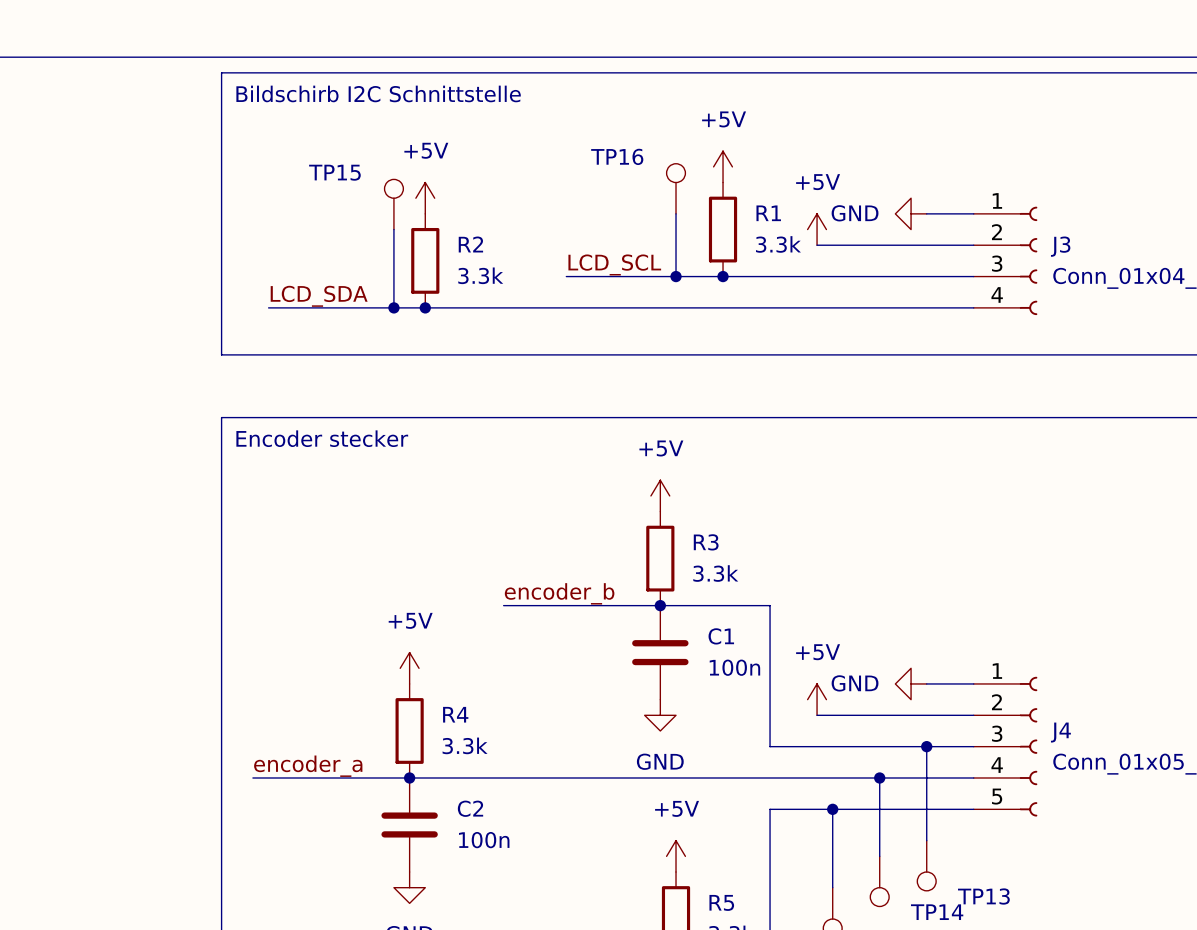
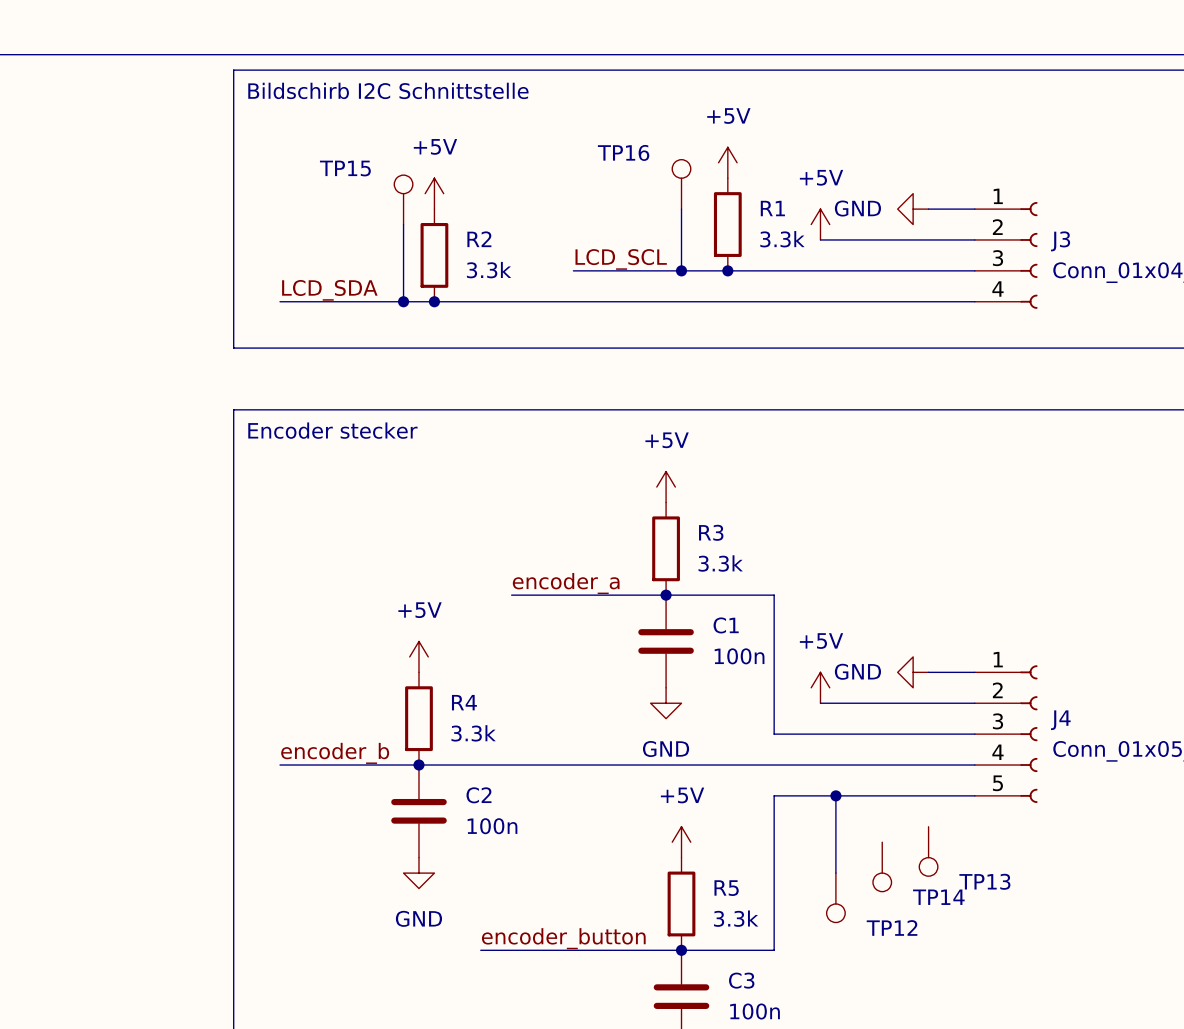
label: encoder_b (559, 593) -> encoder_a (566, 583)
wire: (926, 746) (926, 840) -> none
junction: (926, 746) -> none
label: encoder_a (308, 766) -> encoder_b (335, 753)
wire: (252, 777) (268, 777) -> none
wire: (879, 777) (879, 856) -> none
junction: (879, 777) -> none

